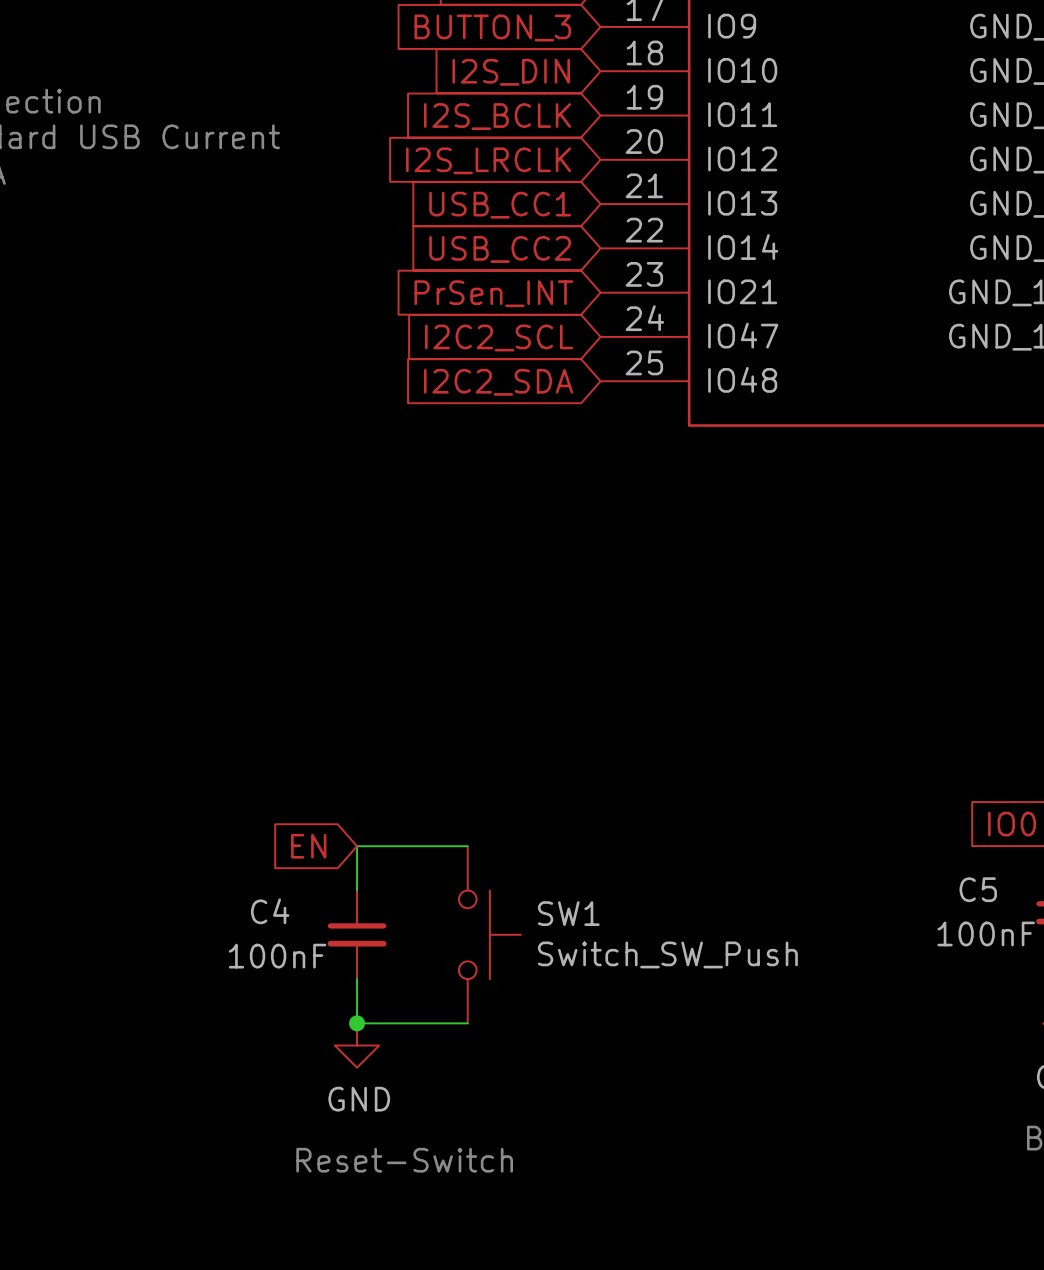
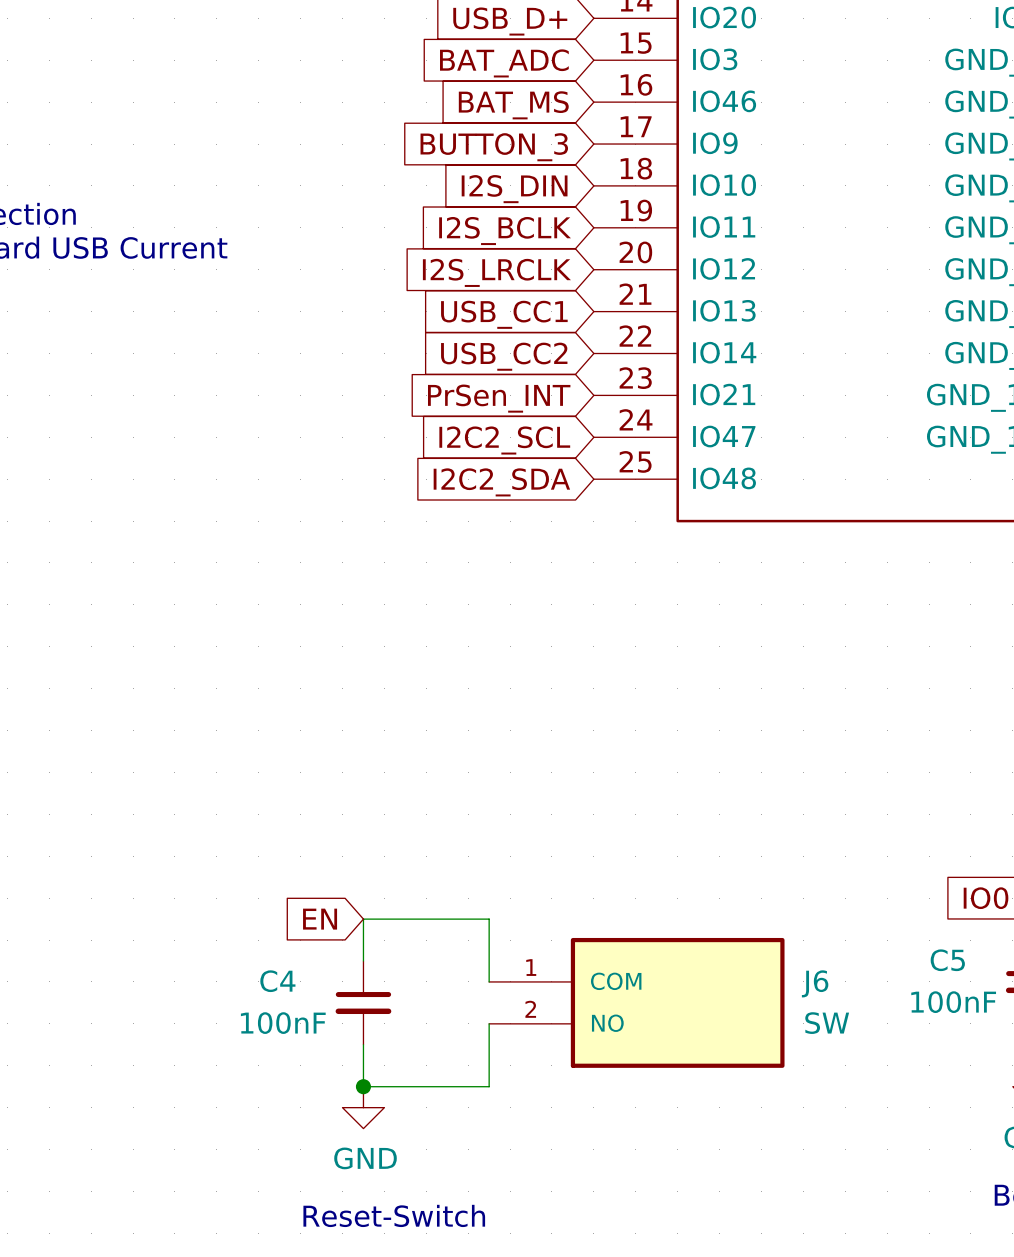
wire: none -> (468, 919) (489, 919) (489, 981)
SW1: Switch_SW_Push (489, 934) -> none
J6: none -> SW (636, 1002)
wire: none -> (489, 1023) (489, 1086) (468, 1086)

